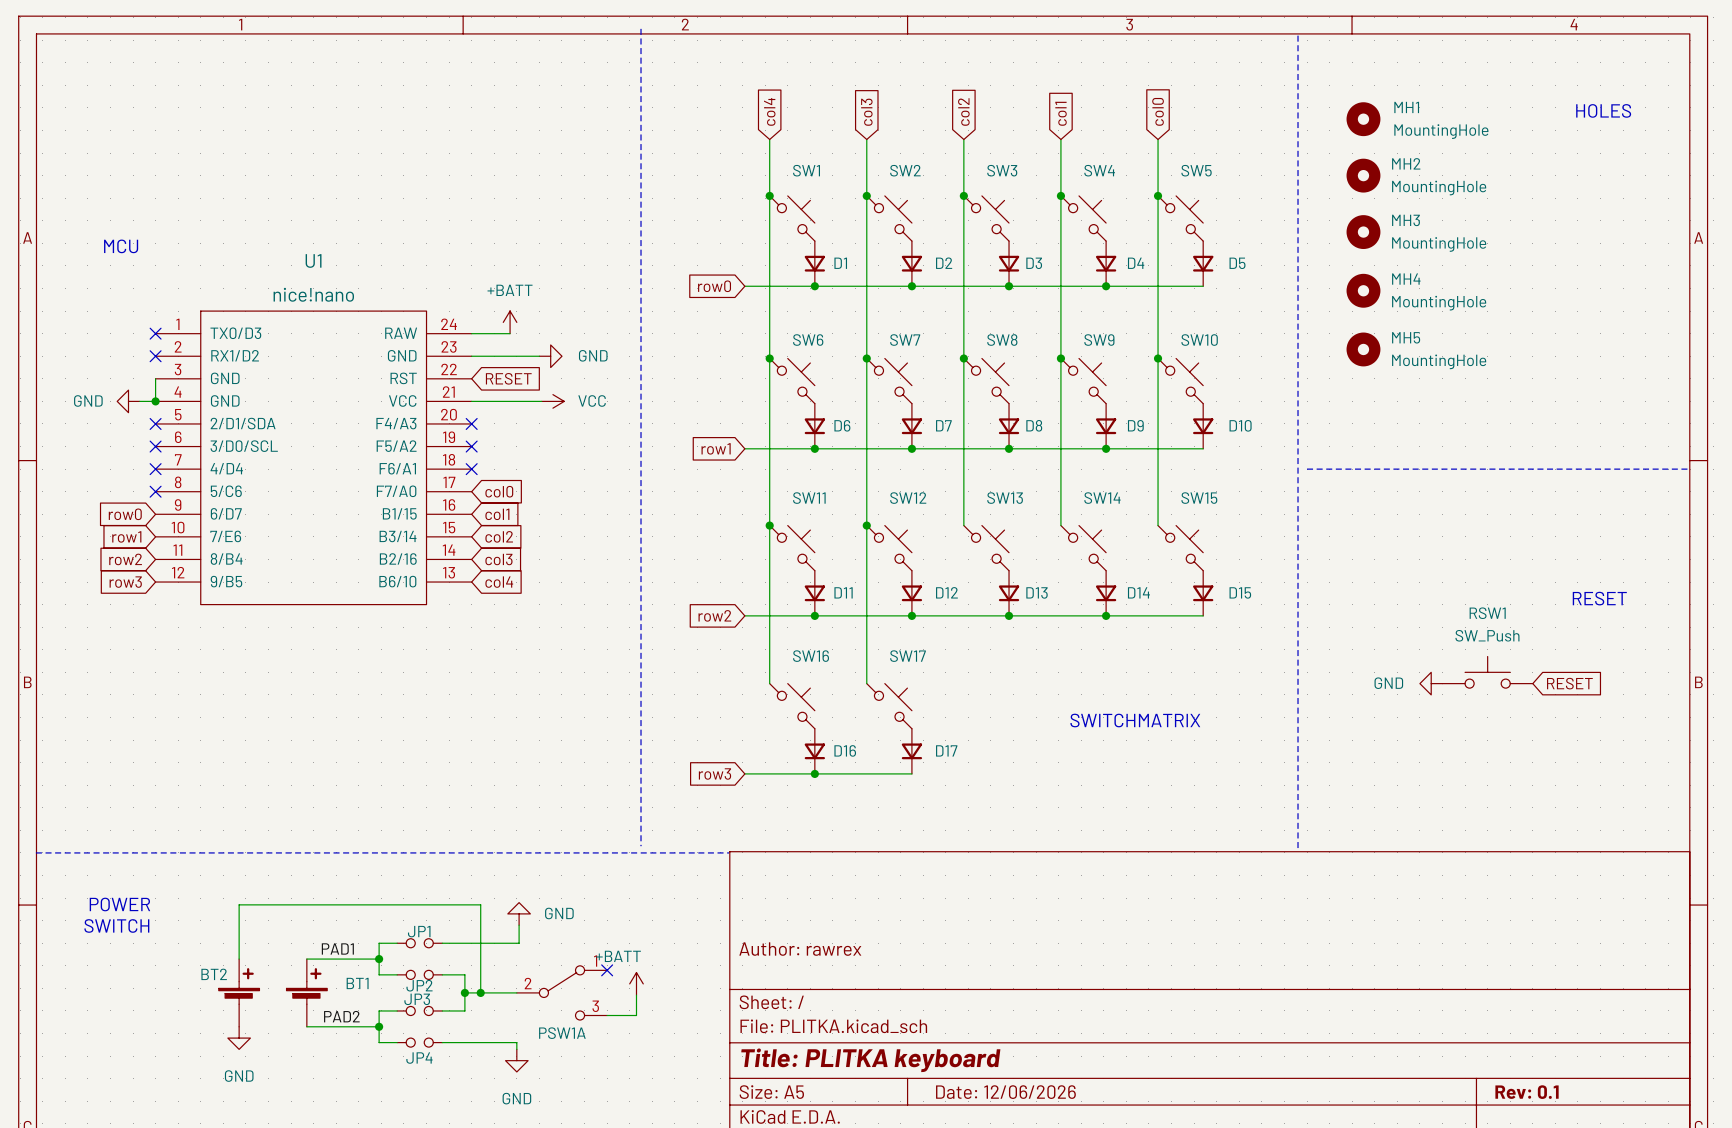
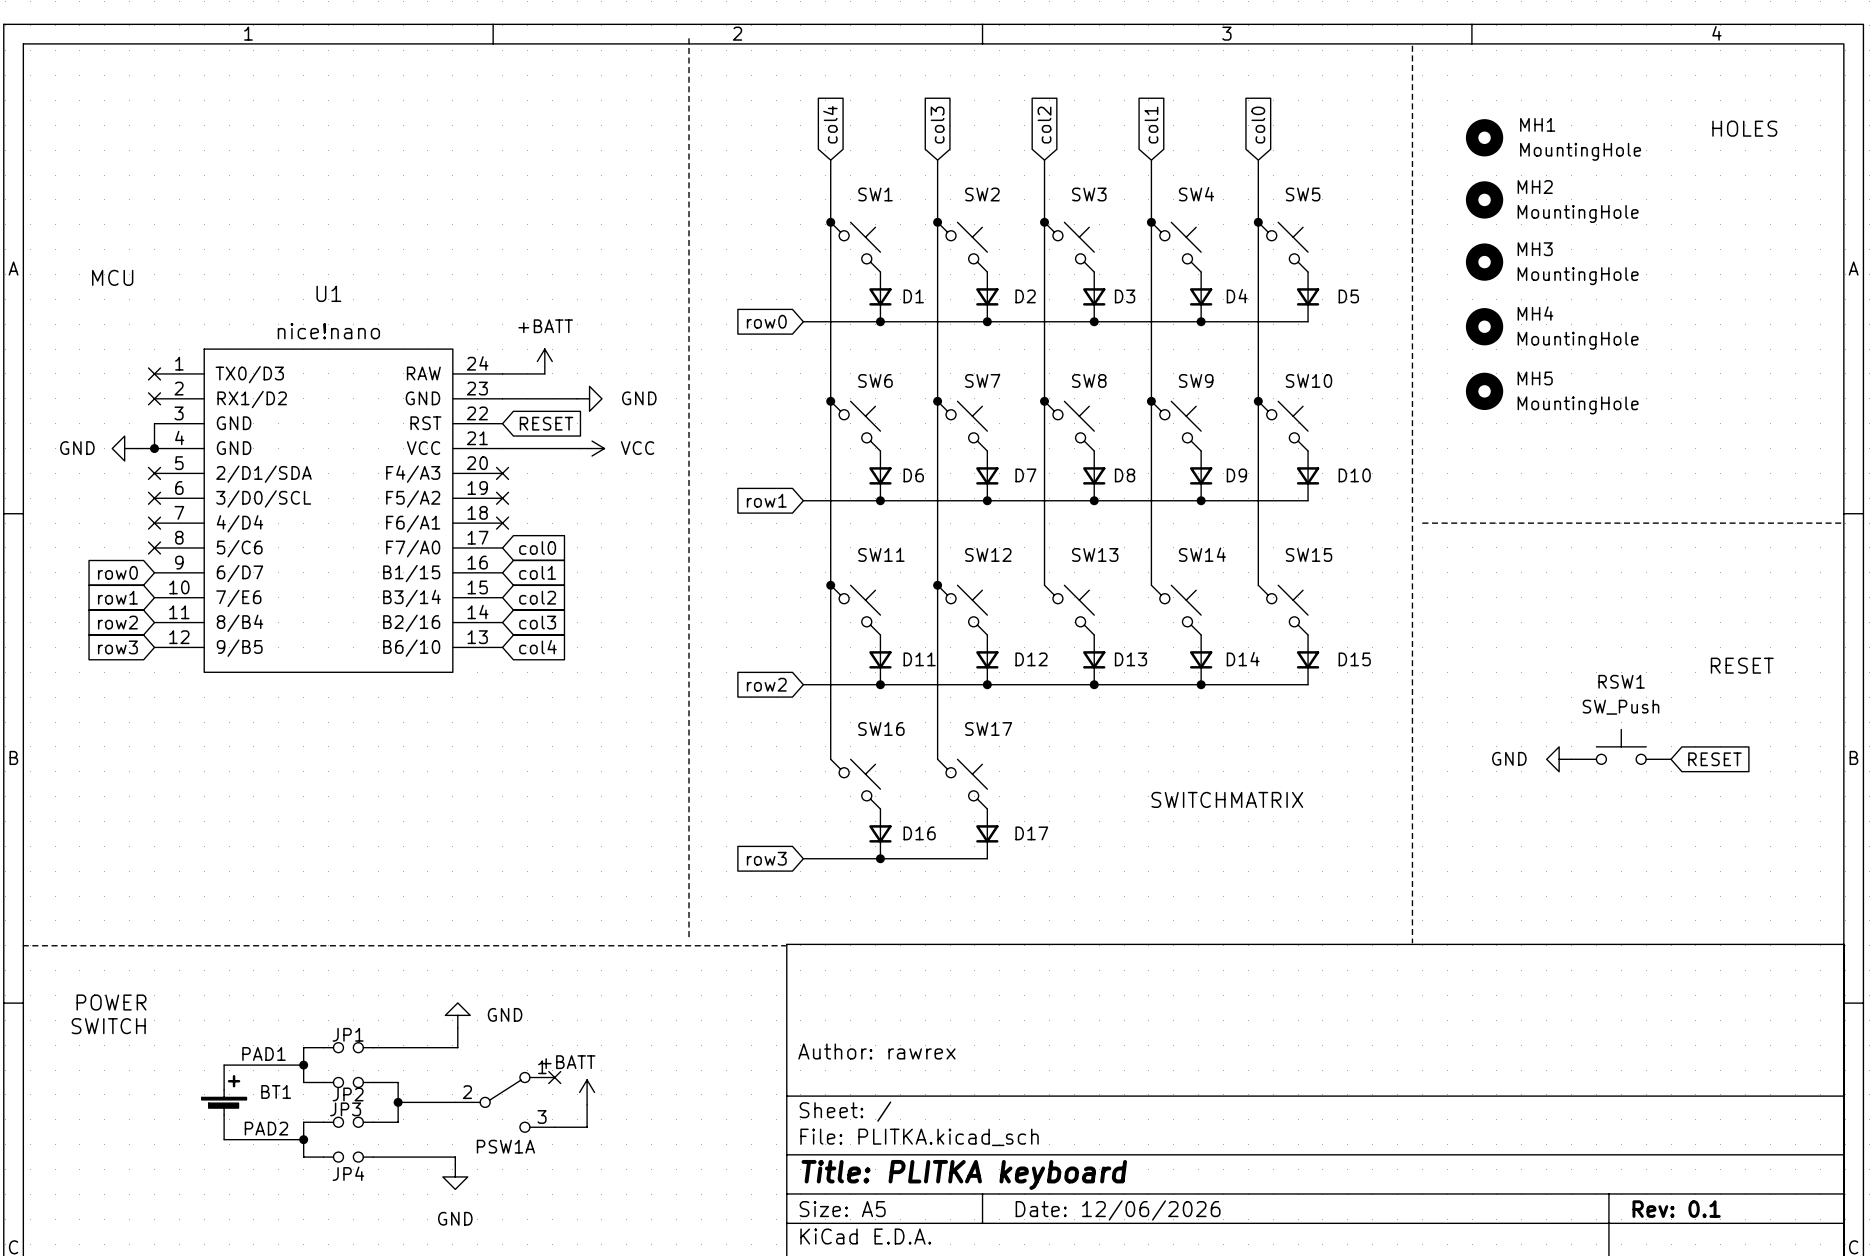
power symbol: GND (519, 913) -> none
power symbol: none -> GND (457, 1015)
wire: (519, 925) (519, 943) (442, 943) -> (457, 1027) (457, 1047) (373, 1047)
wire: (397, 943) (379, 943) (379, 974) (397, 974) -> (323, 1047) (303, 1047) (303, 1082) (323, 1082)
JP1 position: (419, 943) -> (348, 1047)
label position: PAD1 (337, 948) -> PAD1 (263, 1053)
wire: (239, 959) (239, 904) (480, 904) (480, 992) -> none
wire: (306, 959) (379, 959) -> (224, 1065) (303, 1065)
junction: (379, 959) -> none
junction: none -> (303, 1065)
no-connect mark: (607, 970) -> none
no-connect mark: none -> (554, 1077)
JP2 position: (419, 974) -> (348, 1082)
wire: (442, 974) (464, 974) (464, 1010) (442, 1010) -> (373, 1082) (398, 1082) (398, 1122) (373, 1122)
power symbol position: +BATT (636, 983) -> +BATT (587, 1092)
BT2: (239, 992) -> none
BT1 position: (306, 992) -> (224, 1102)
wire: (464, 992) (516, 992) -> (398, 1102) (455, 1102)
junction: (464, 992) -> none
junction: (480, 992) -> none
PSW1A position: (561, 992) -> (505, 1102)
junction: none -> (398, 1102)
wire: (636, 995) (636, 1015) (607, 1015) -> (587, 1104) (587, 1127) (554, 1127)
wire: (397, 1010) (379, 1010) (379, 1042) (397, 1042) -> (323, 1122) (303, 1122) (303, 1157) (323, 1157)
JP3 position: (419, 1010) -> (348, 1122)
label position: PAD2 (341, 1016) -> PAD2 (266, 1128)
wire: (306, 1026) (379, 1026) -> (224, 1139) (303, 1139)
junction: (379, 1026) -> none
junction: none -> (303, 1139)
power symbol: GND (239, 1038) -> none
JP4 position: (419, 1042) -> (348, 1157)
wire: (442, 1042) (516, 1042) (516, 1049) -> (373, 1157) (455, 1157) (455, 1164)
power symbol: GND (516, 1060) -> none
power symbol: none -> GND (455, 1176)

